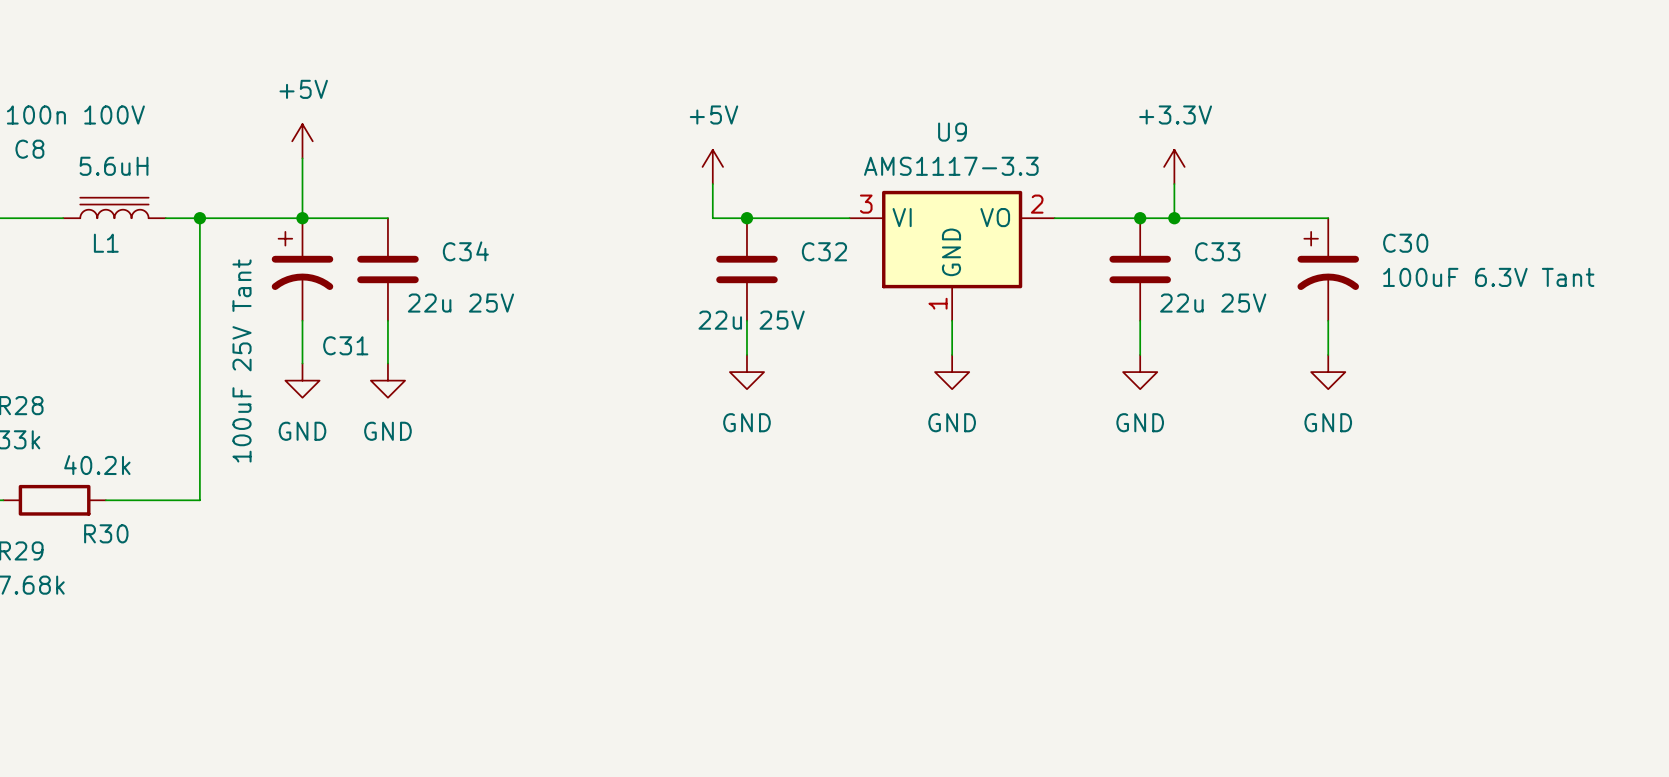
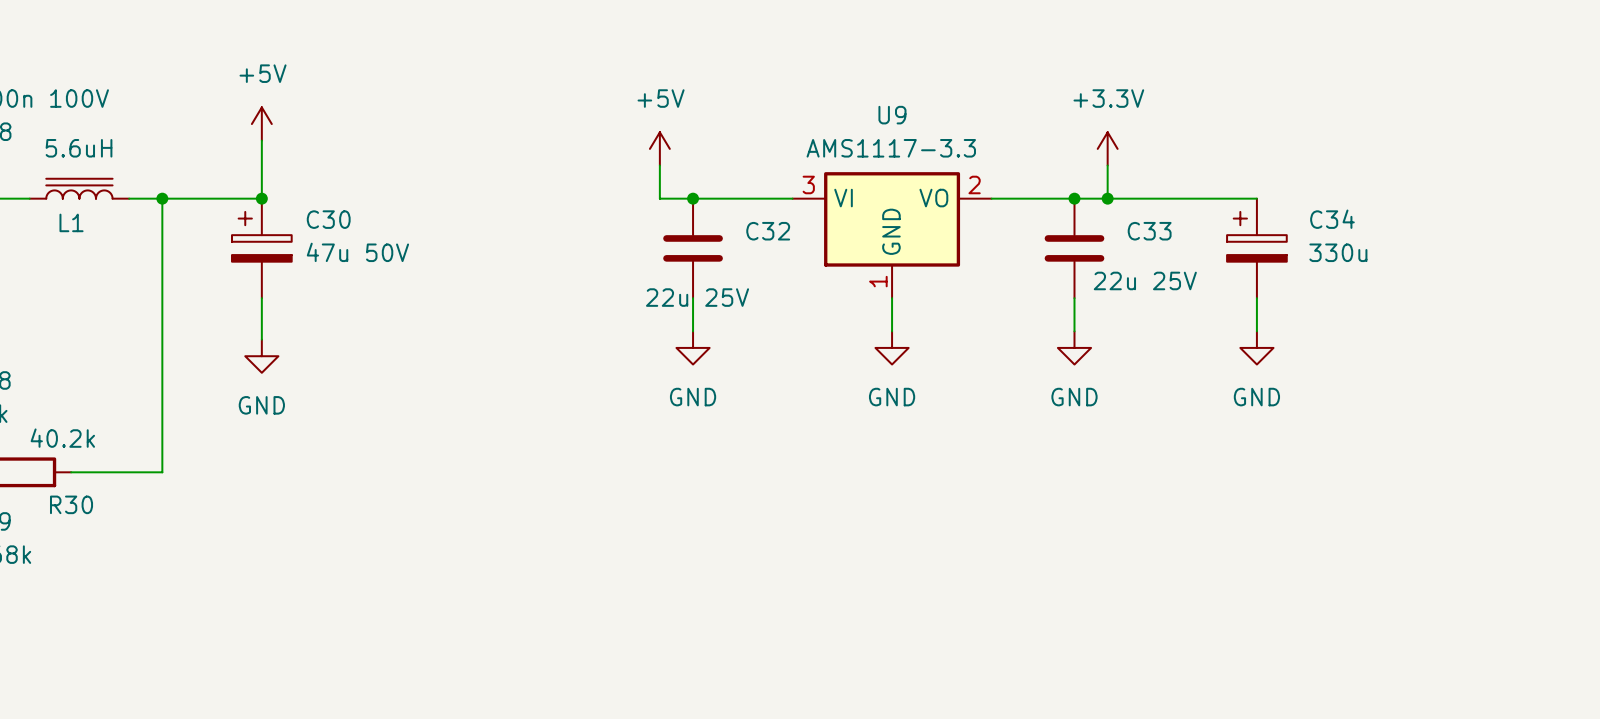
wire: (302, 218) (387, 218) -> none
C34 symbol: [357, 218, 419, 321] -> [1227, 198, 1287, 299]
C30 symbol: [1297, 218, 1360, 321] -> [231, 198, 292, 299]
C31: 100uF 25V Tant (302, 269) -> none
C30 value: 100uF 6.3V Tant (1488, 277) -> 47u 50V (357, 252)
C34 value: 22u 25V (460, 303) -> 330u (1338, 252)
wire: (387, 320) (387, 363) -> none
power symbol: GND (387, 380) -> none

